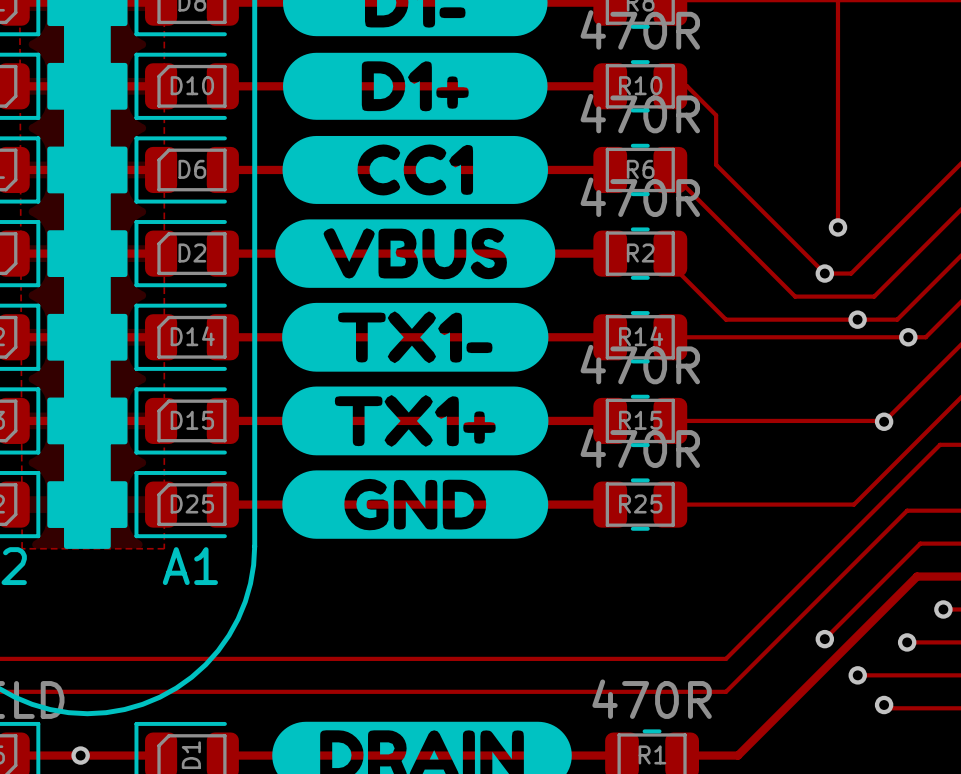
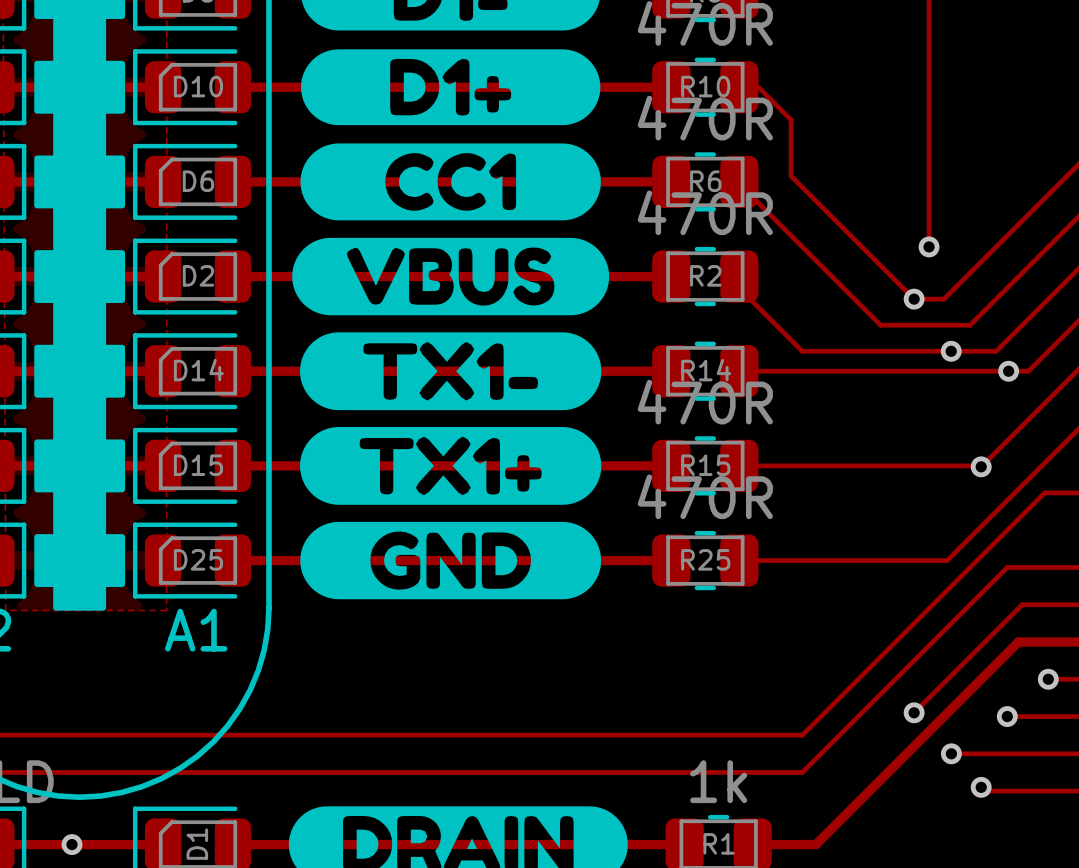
R1 value: 470R (652, 699) -> 1k (718, 781)

